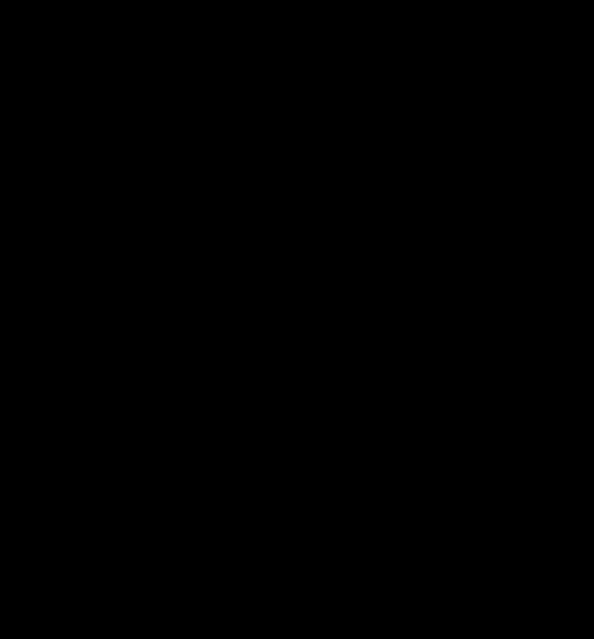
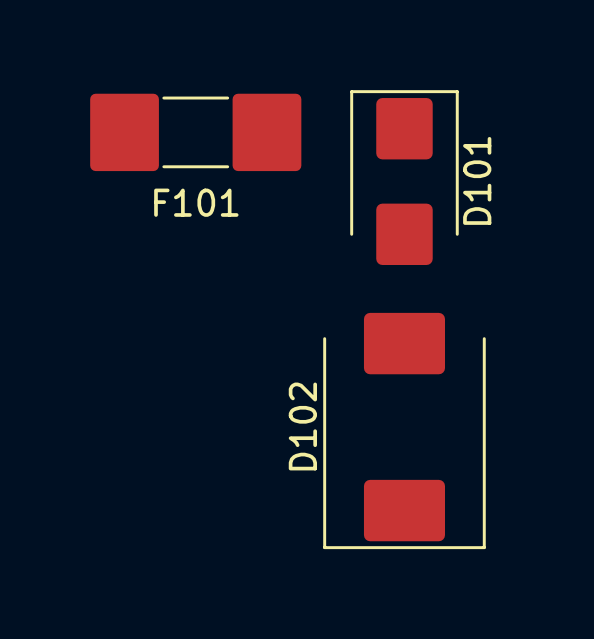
F101: none -> (195, 132)
D101: none -> (404, 177)
D102: none -> (404, 431)

